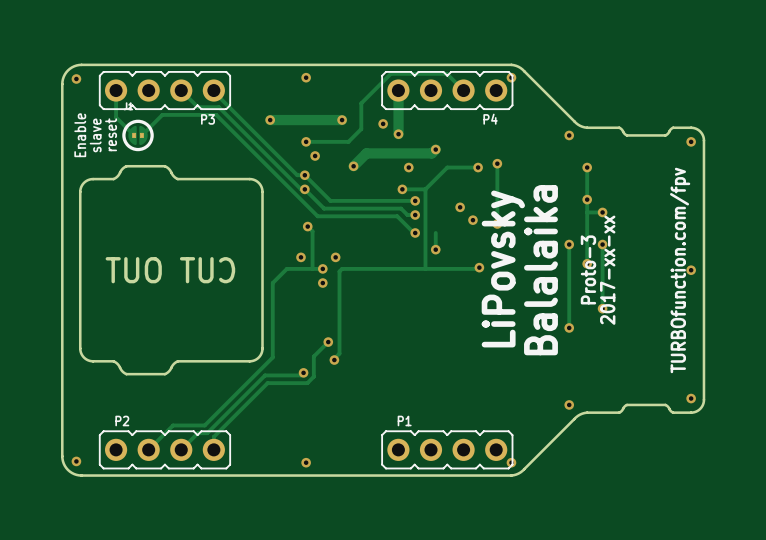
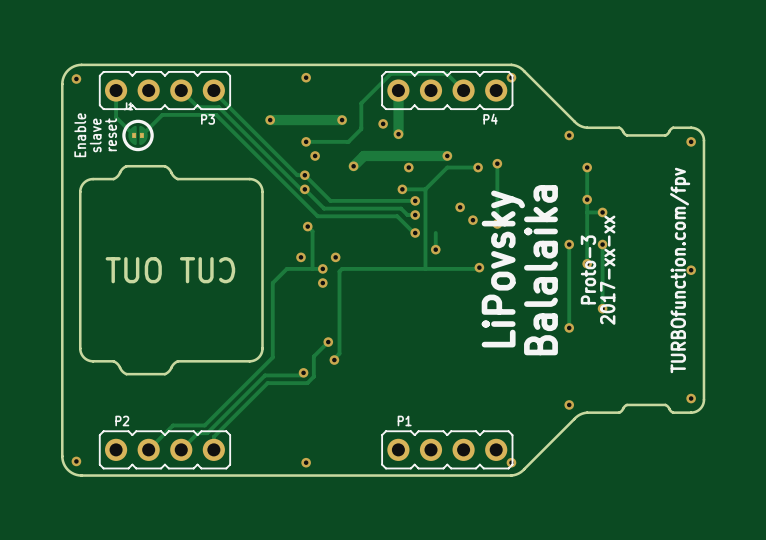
track: (435, 149) (431, 153) (366, 153) (363, 155) -> (447, 155) (363, 155)
via position: (435, 149) -> (447, 155)

